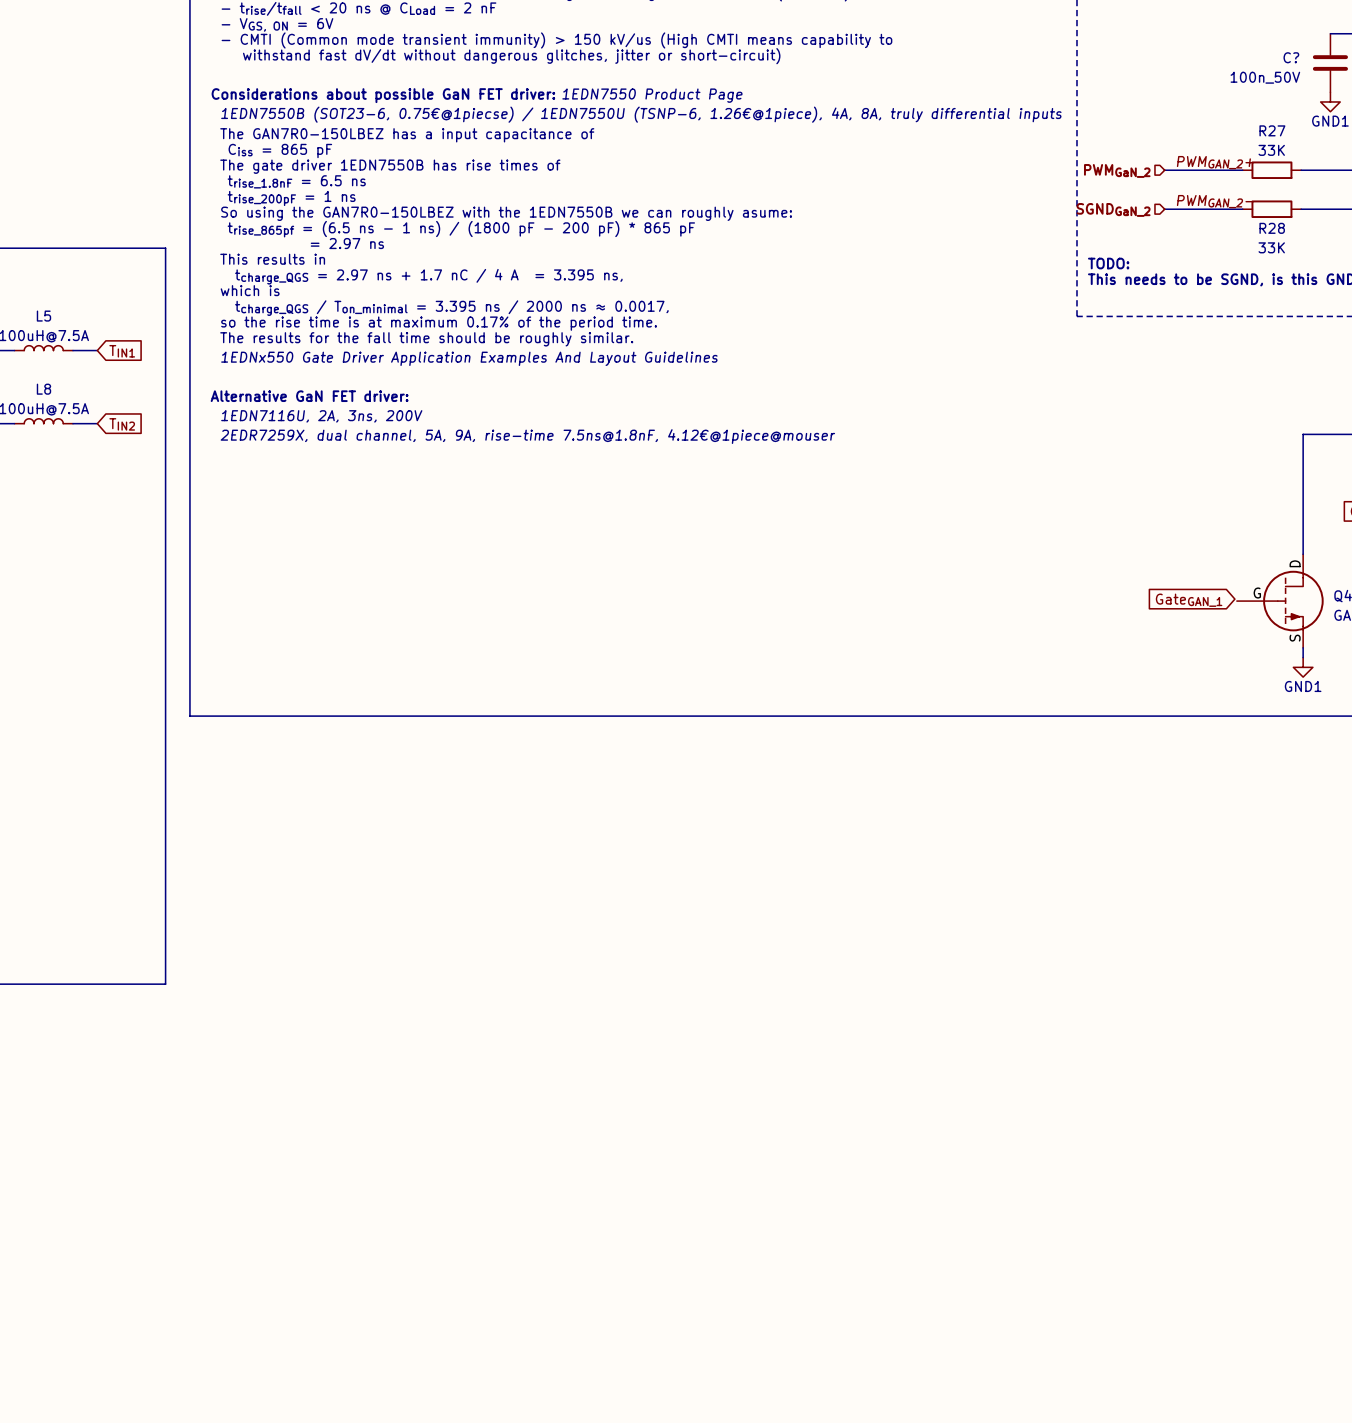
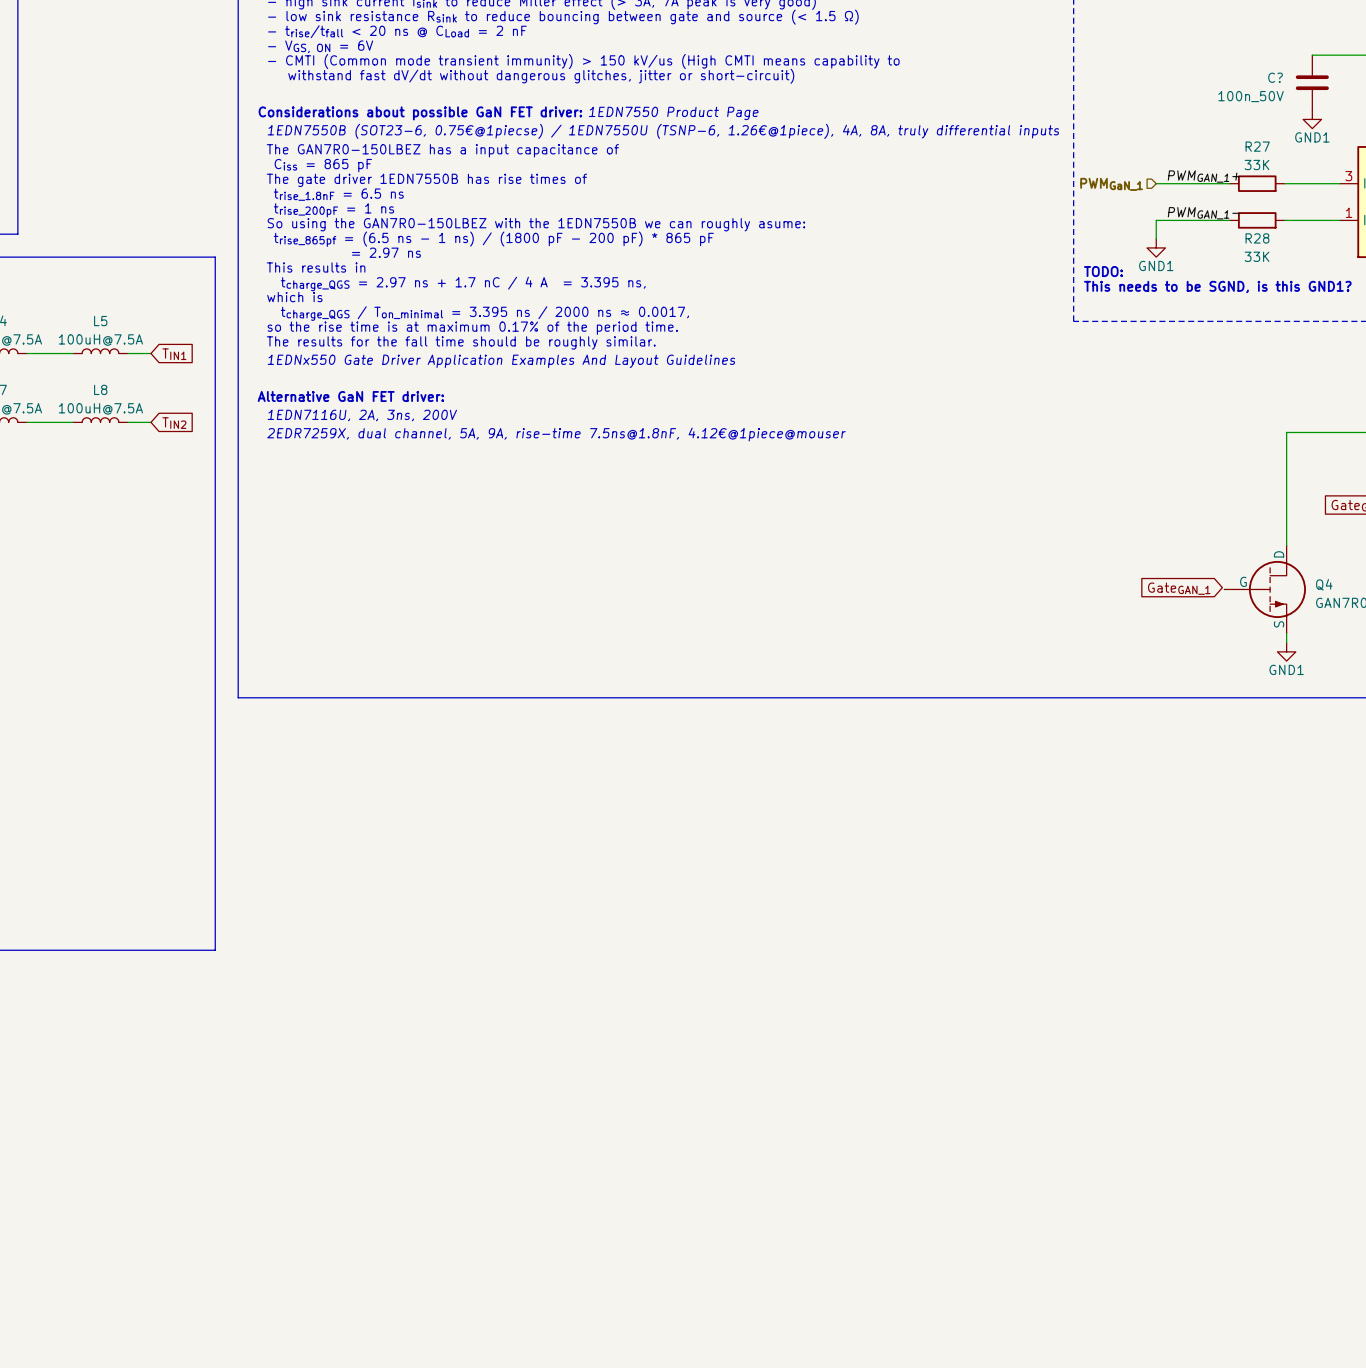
label: PWMGAN_2+ (1215, 162) -> PWMGAN_1+ (1204, 176)
hierarchical label: PWMGaN_2 (1117, 170) -> PWMGaN_1 (1111, 184)
label: PWMGAN_2- (1215, 201) -> PWMGAN_1- (1204, 213)
hierarchical label: SGNDGaN_2 (1113, 209) -> none
wire: none -> (1156, 220) (1156, 238)
power symbol: none -> GND1 (1156, 247)

